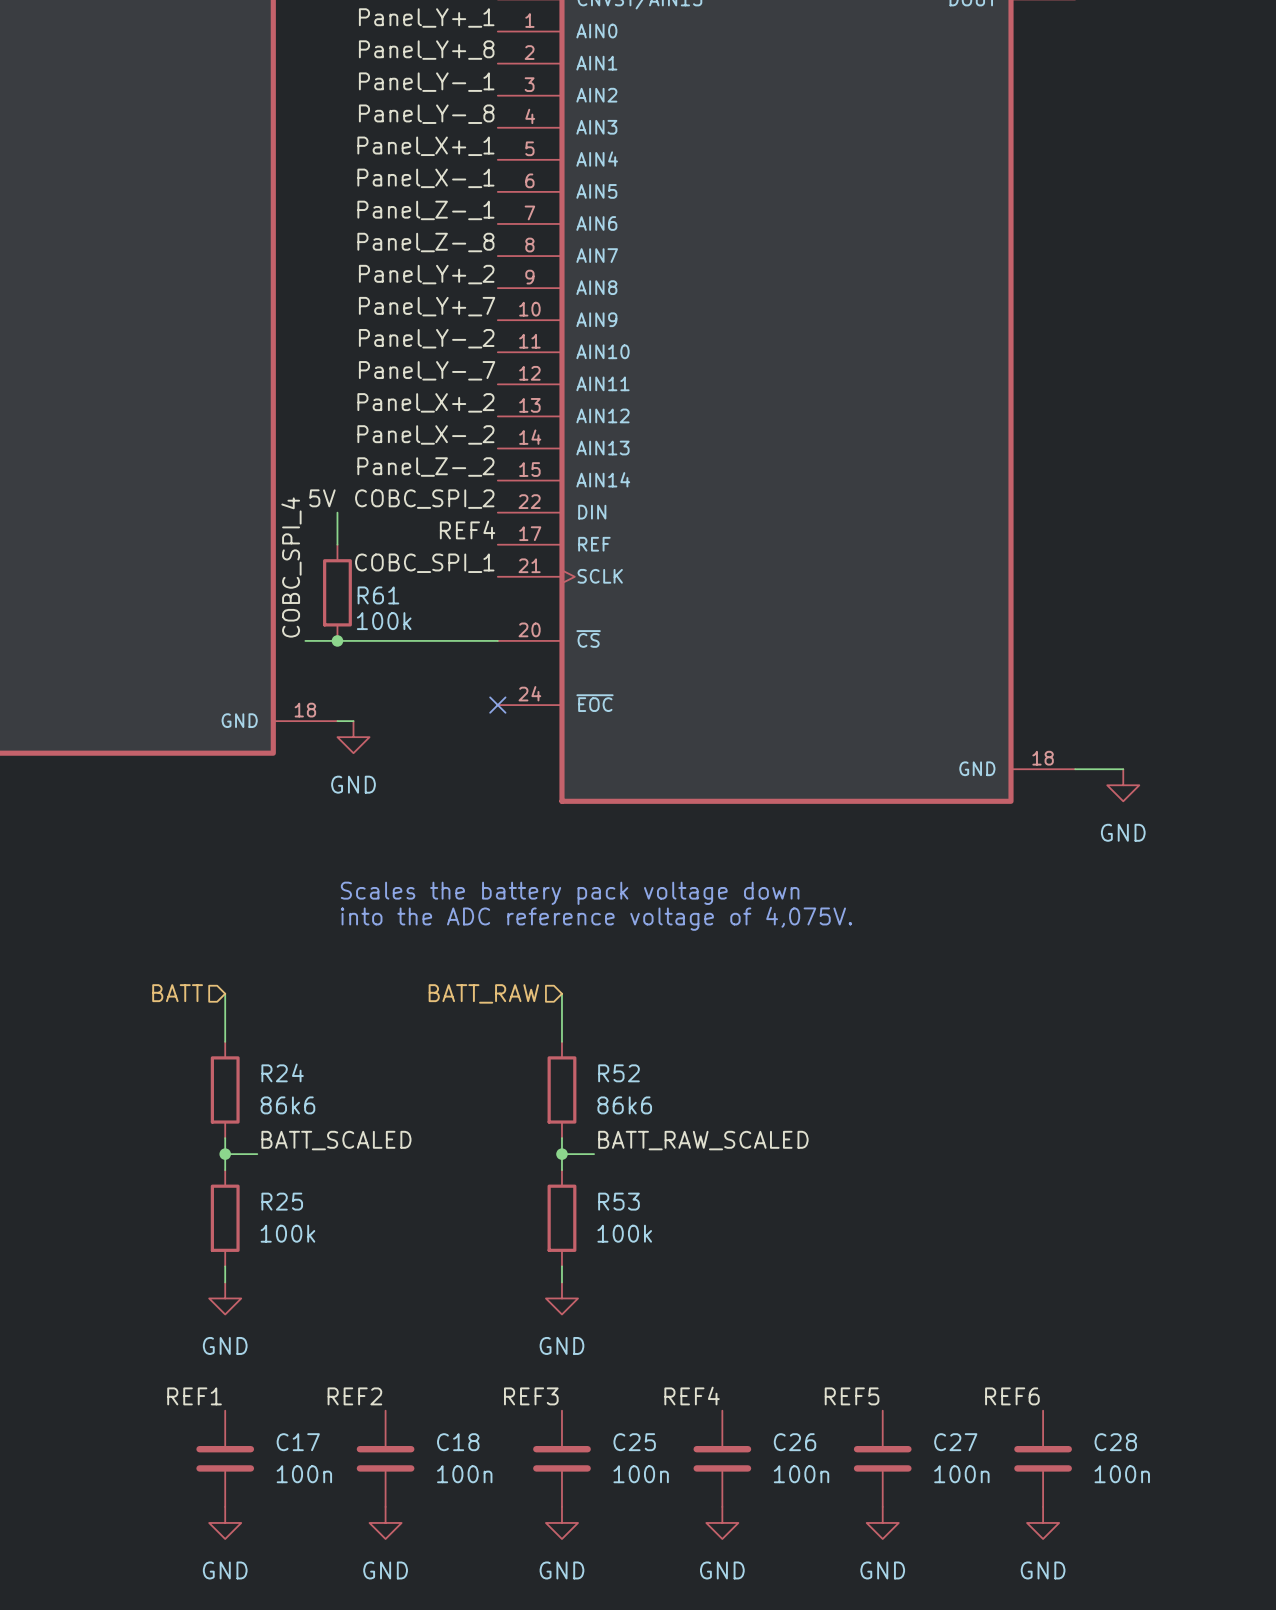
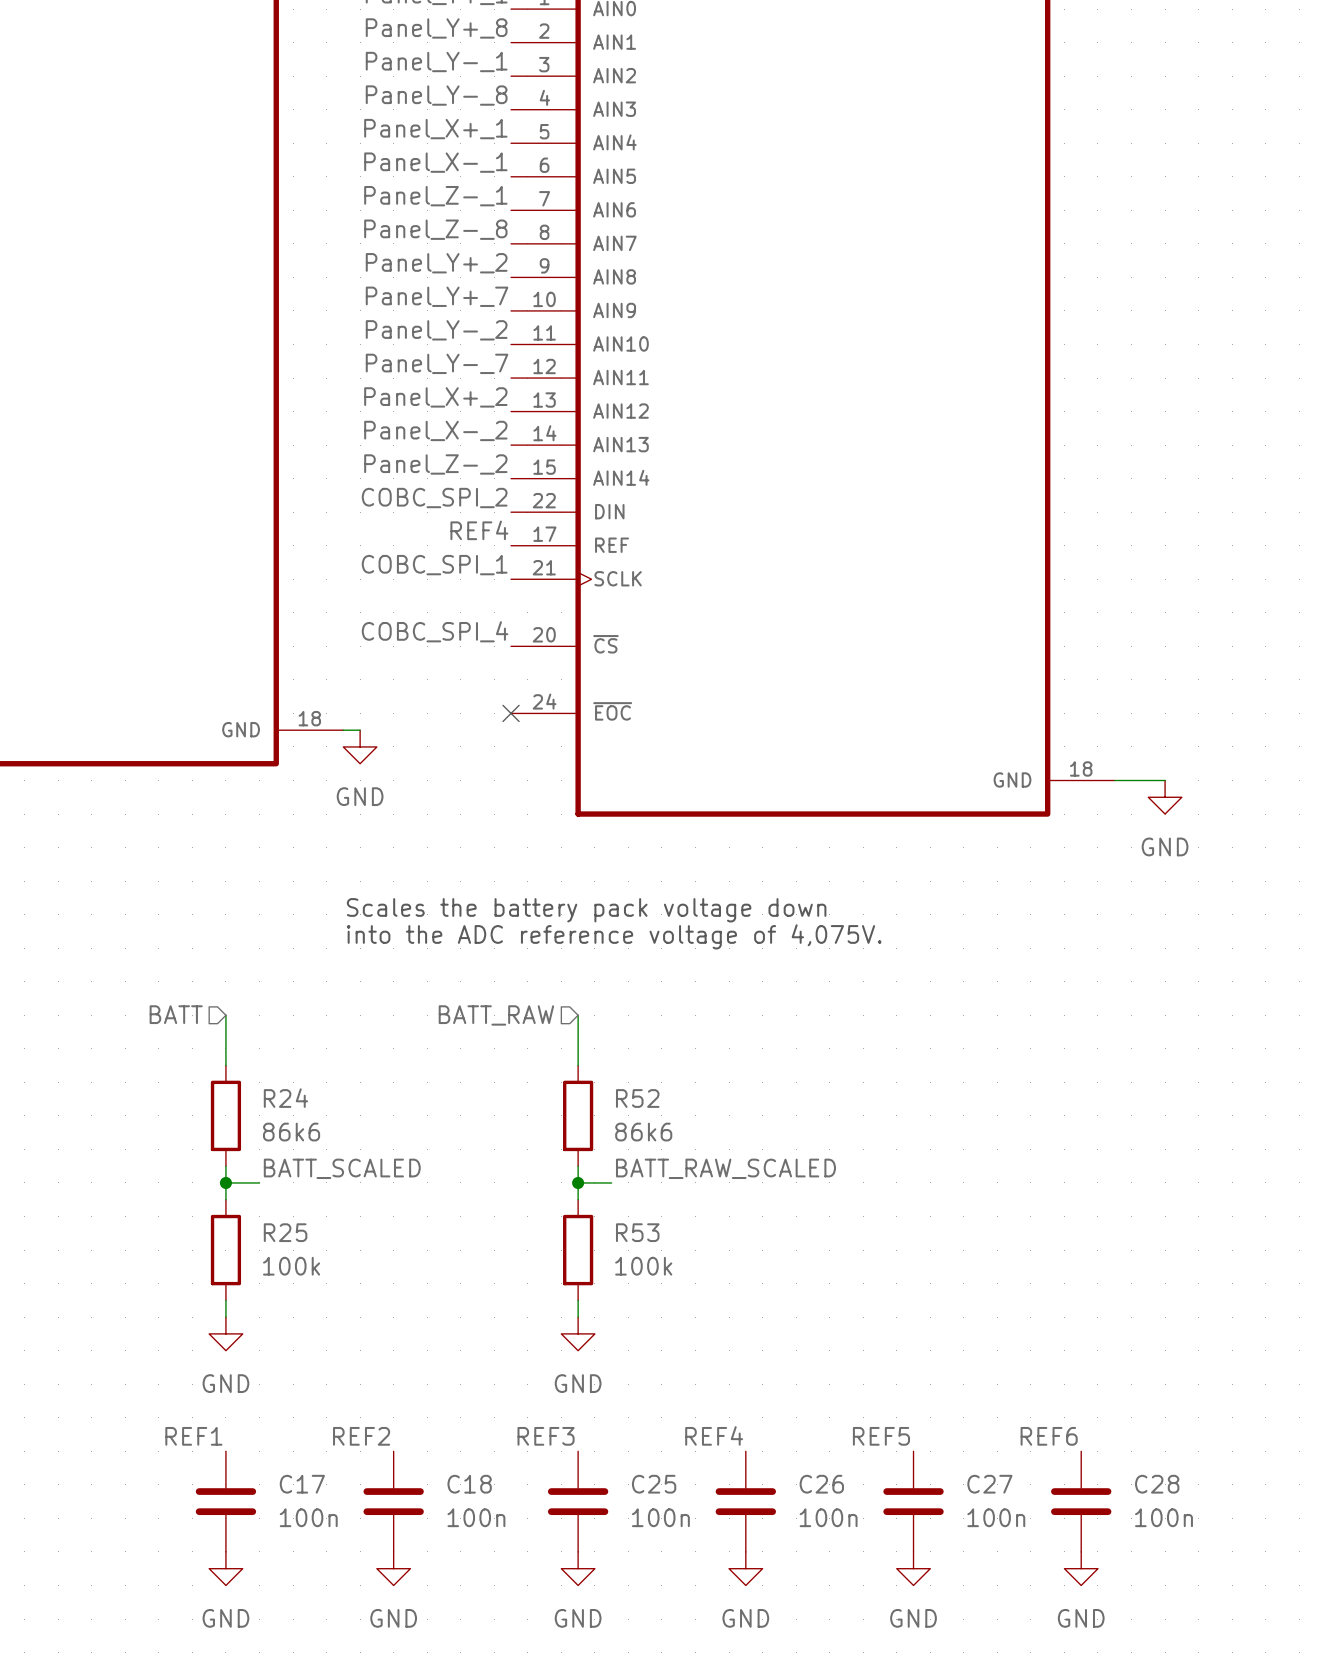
label: 5V (322, 498) -> none
wire: (337, 512) (337, 544) -> none
label rotation: 0° (291, 567) -> 90° clockwise (435, 631)
R61: 100k (337, 592) -> none
wire: (305, 640) (497, 640) -> none
junction: (337, 640) -> none

